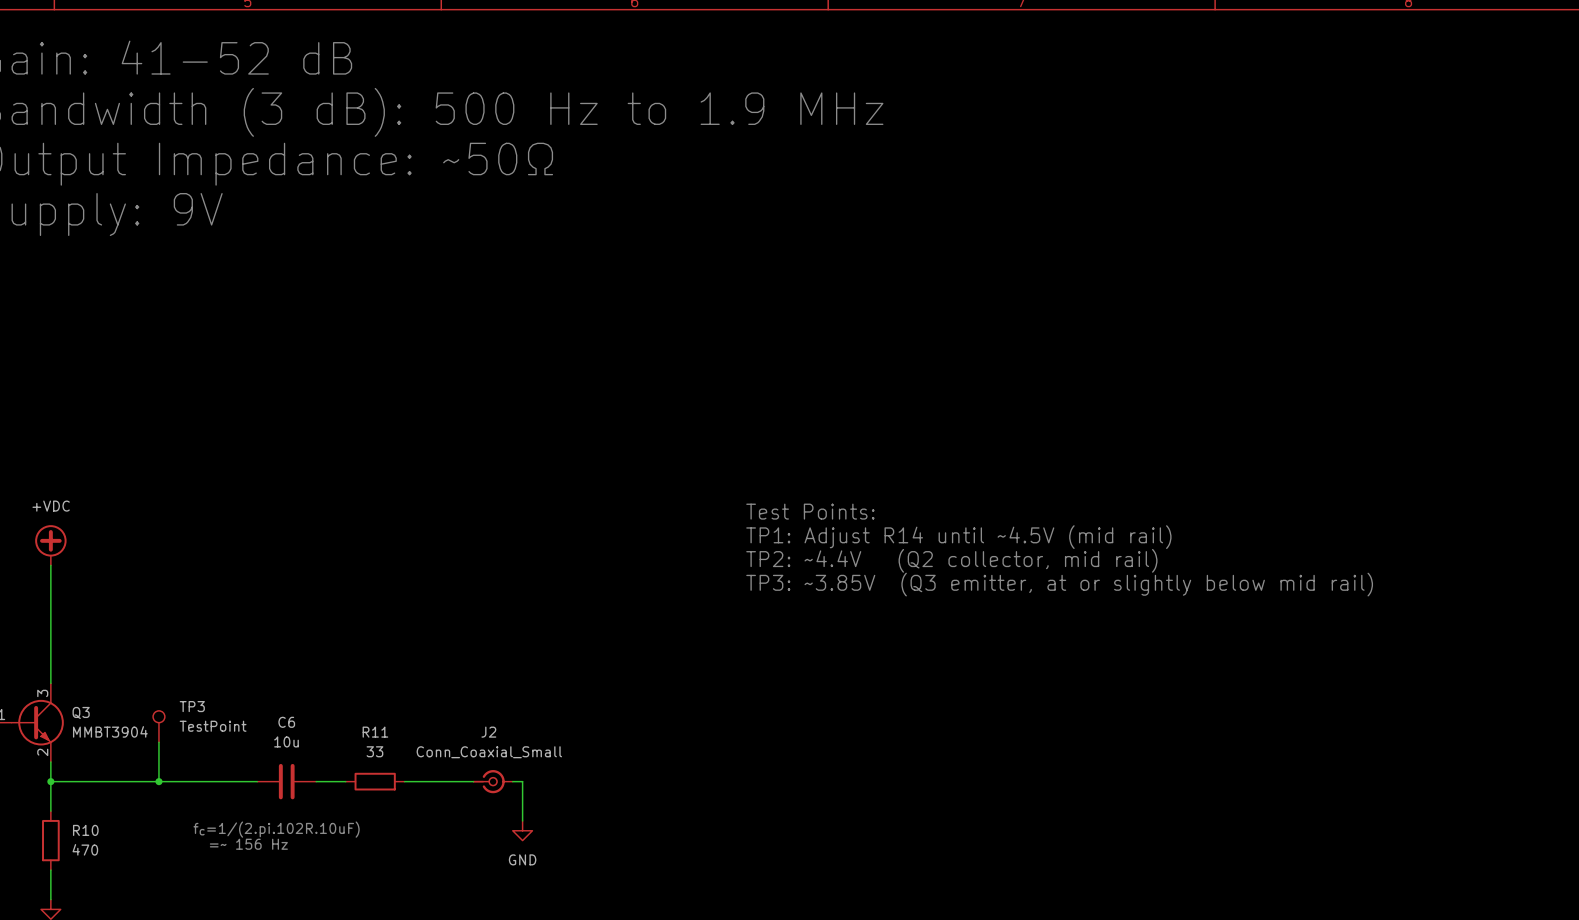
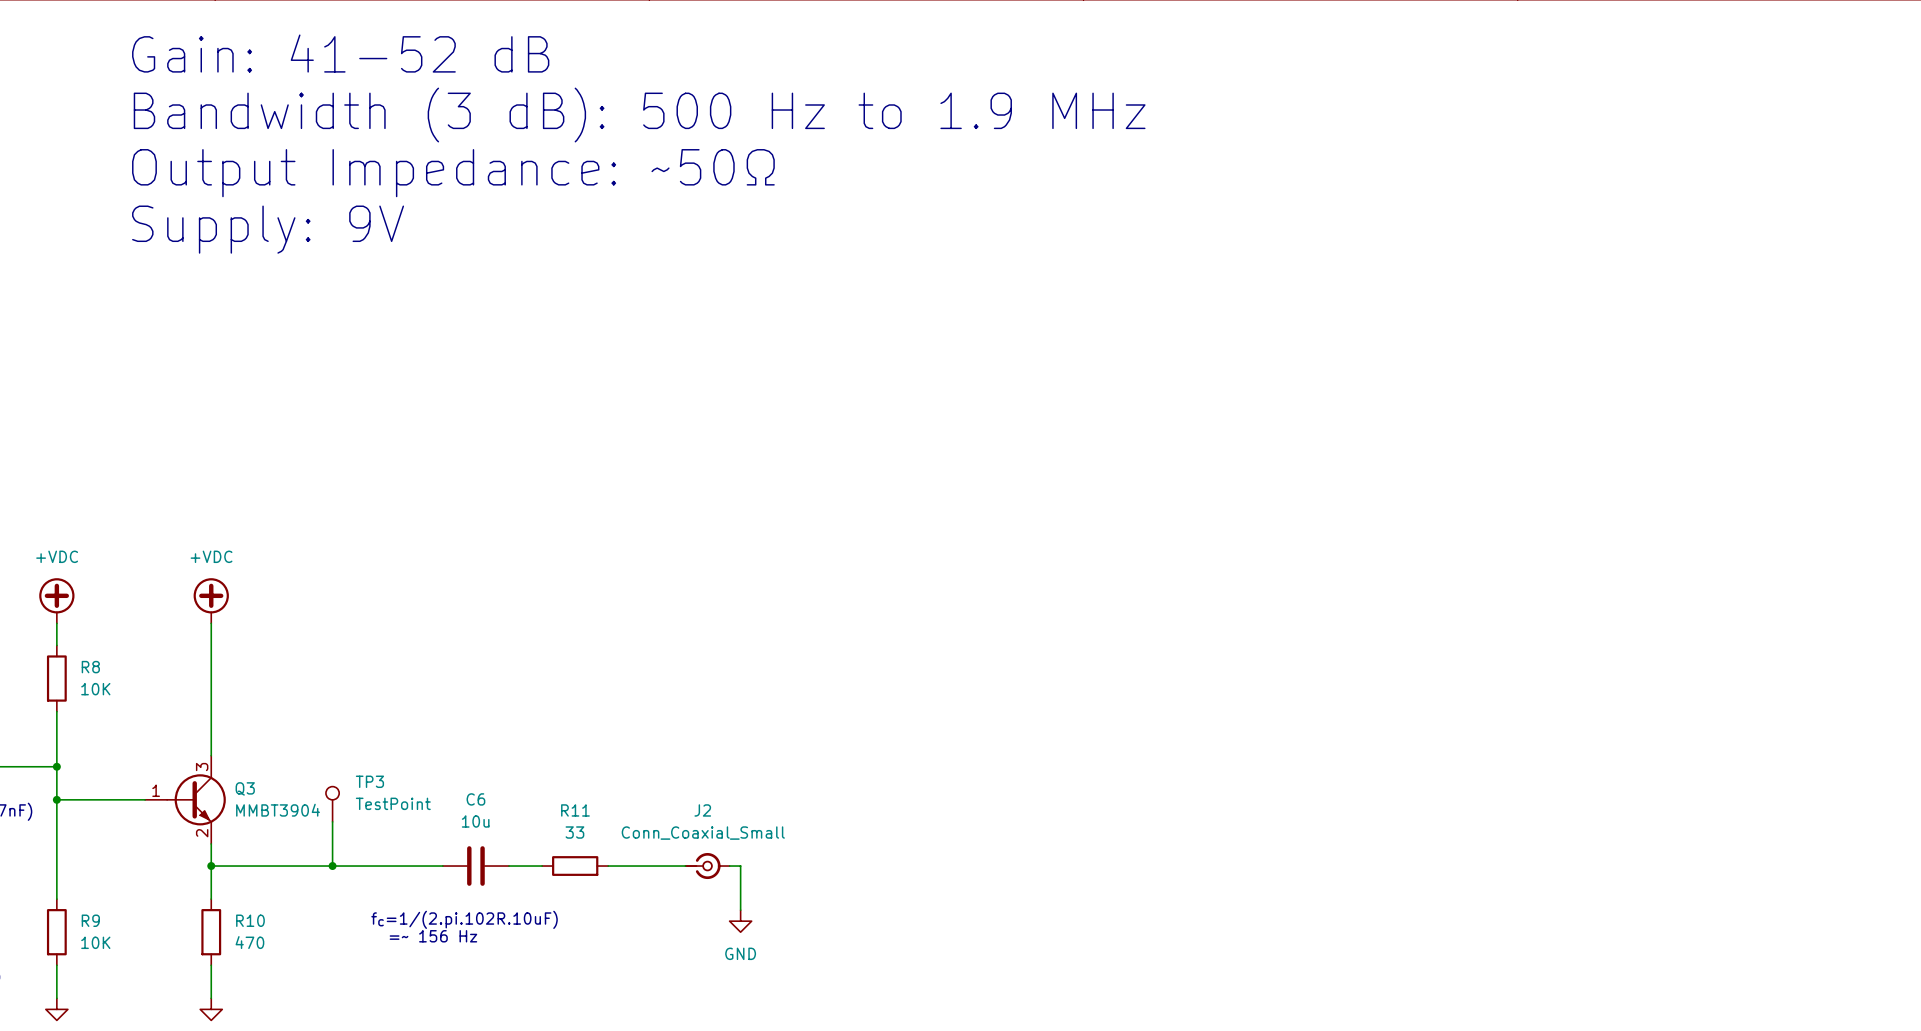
text: Test Points: (810, 511) -> none
text: TP1: Adjust R14 until ~4.5V (mid rail) (958, 537) -> none
text: TP2: ~4.4V (Q2 collector, mid rail) (951, 560) -> none
text: TP3: ~3.85V (Q3 emitter, at or slightly below mid rail) (1059, 584) -> none

